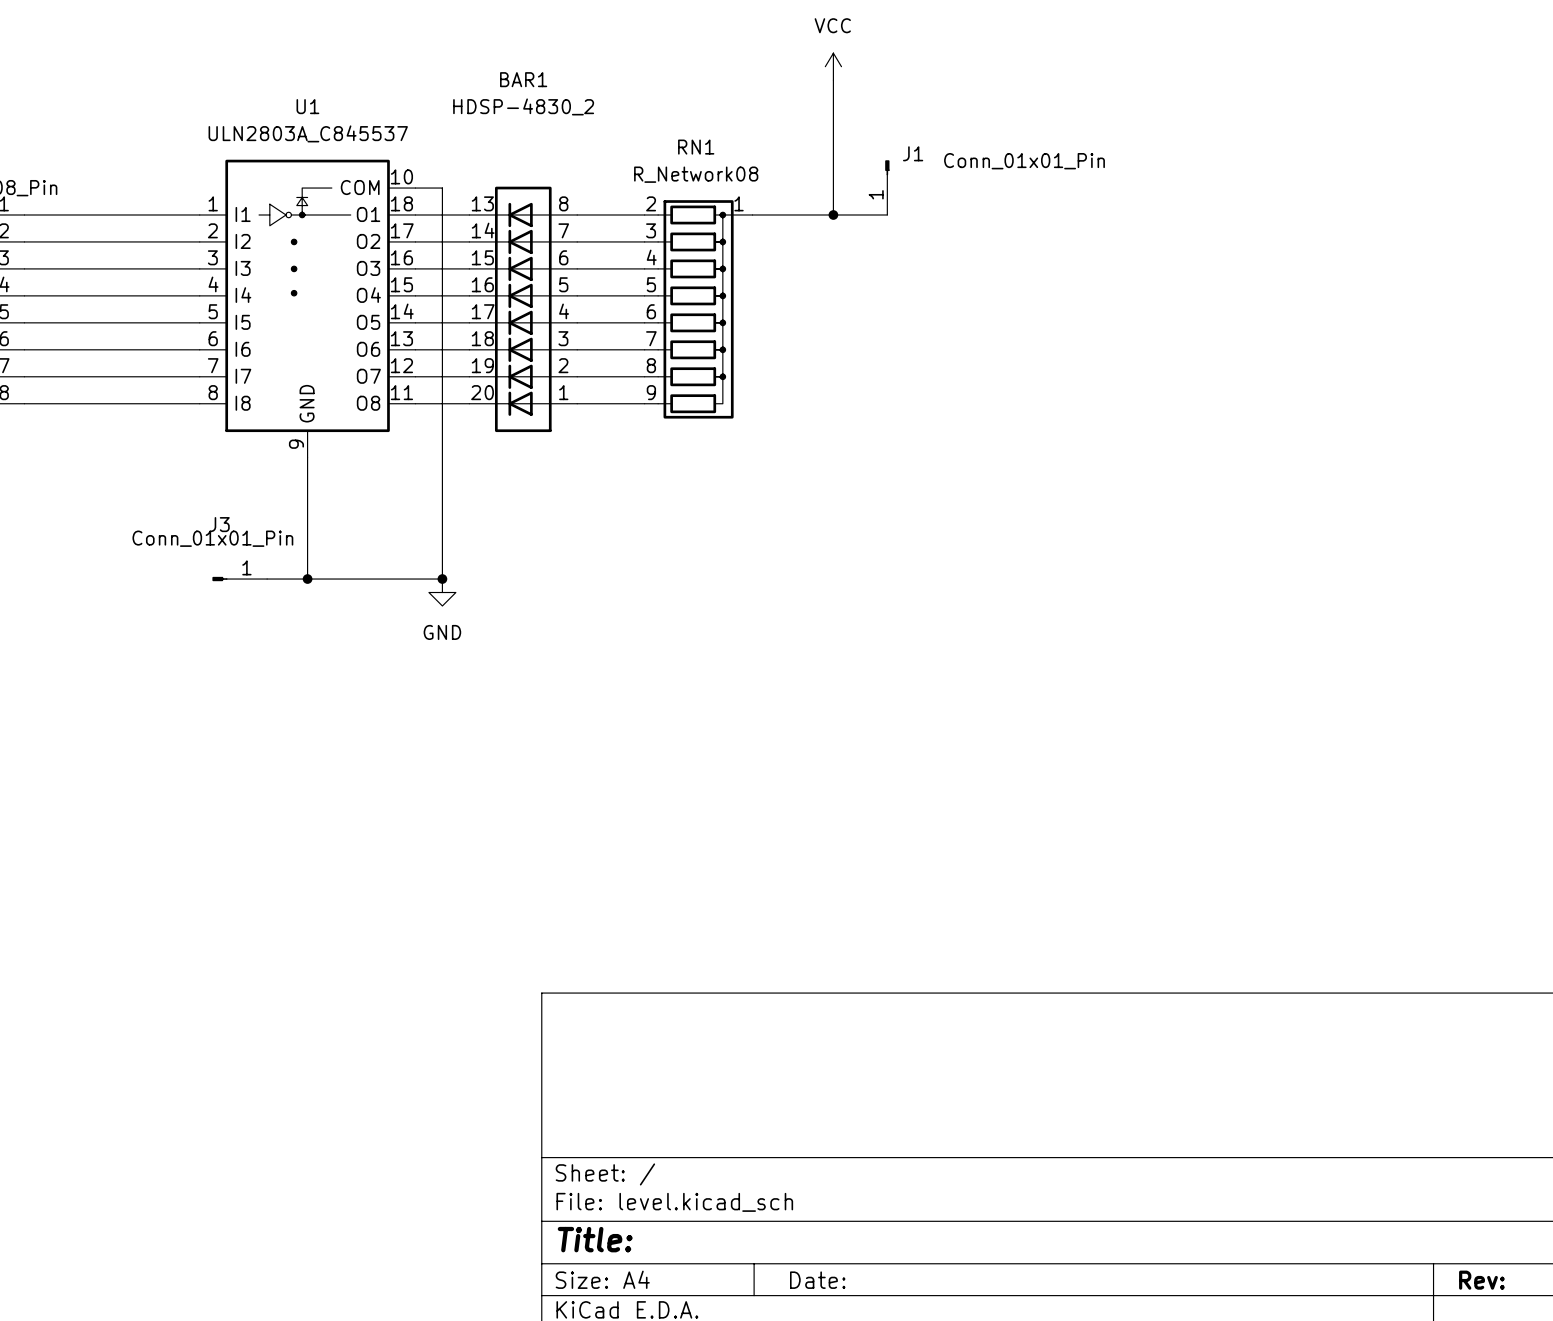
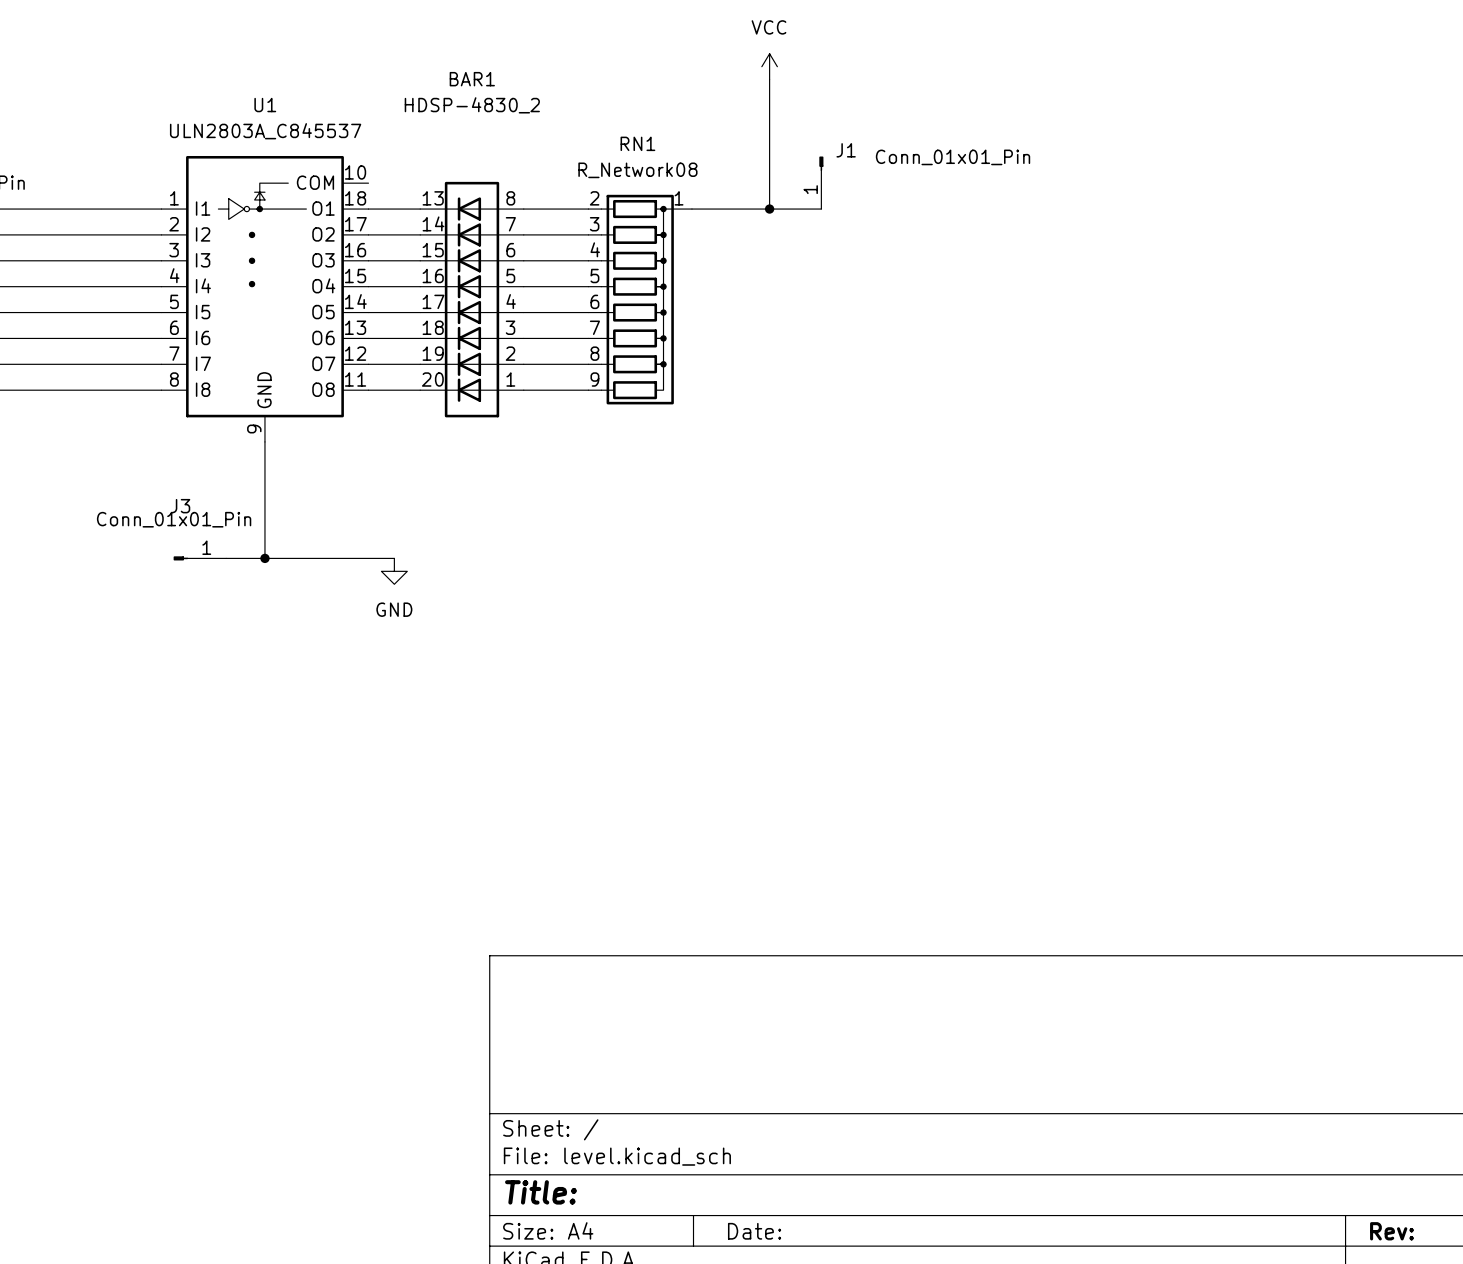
wire: (415, 188) (442, 188) (442, 579) -> none
junction: (442, 579) -> none

